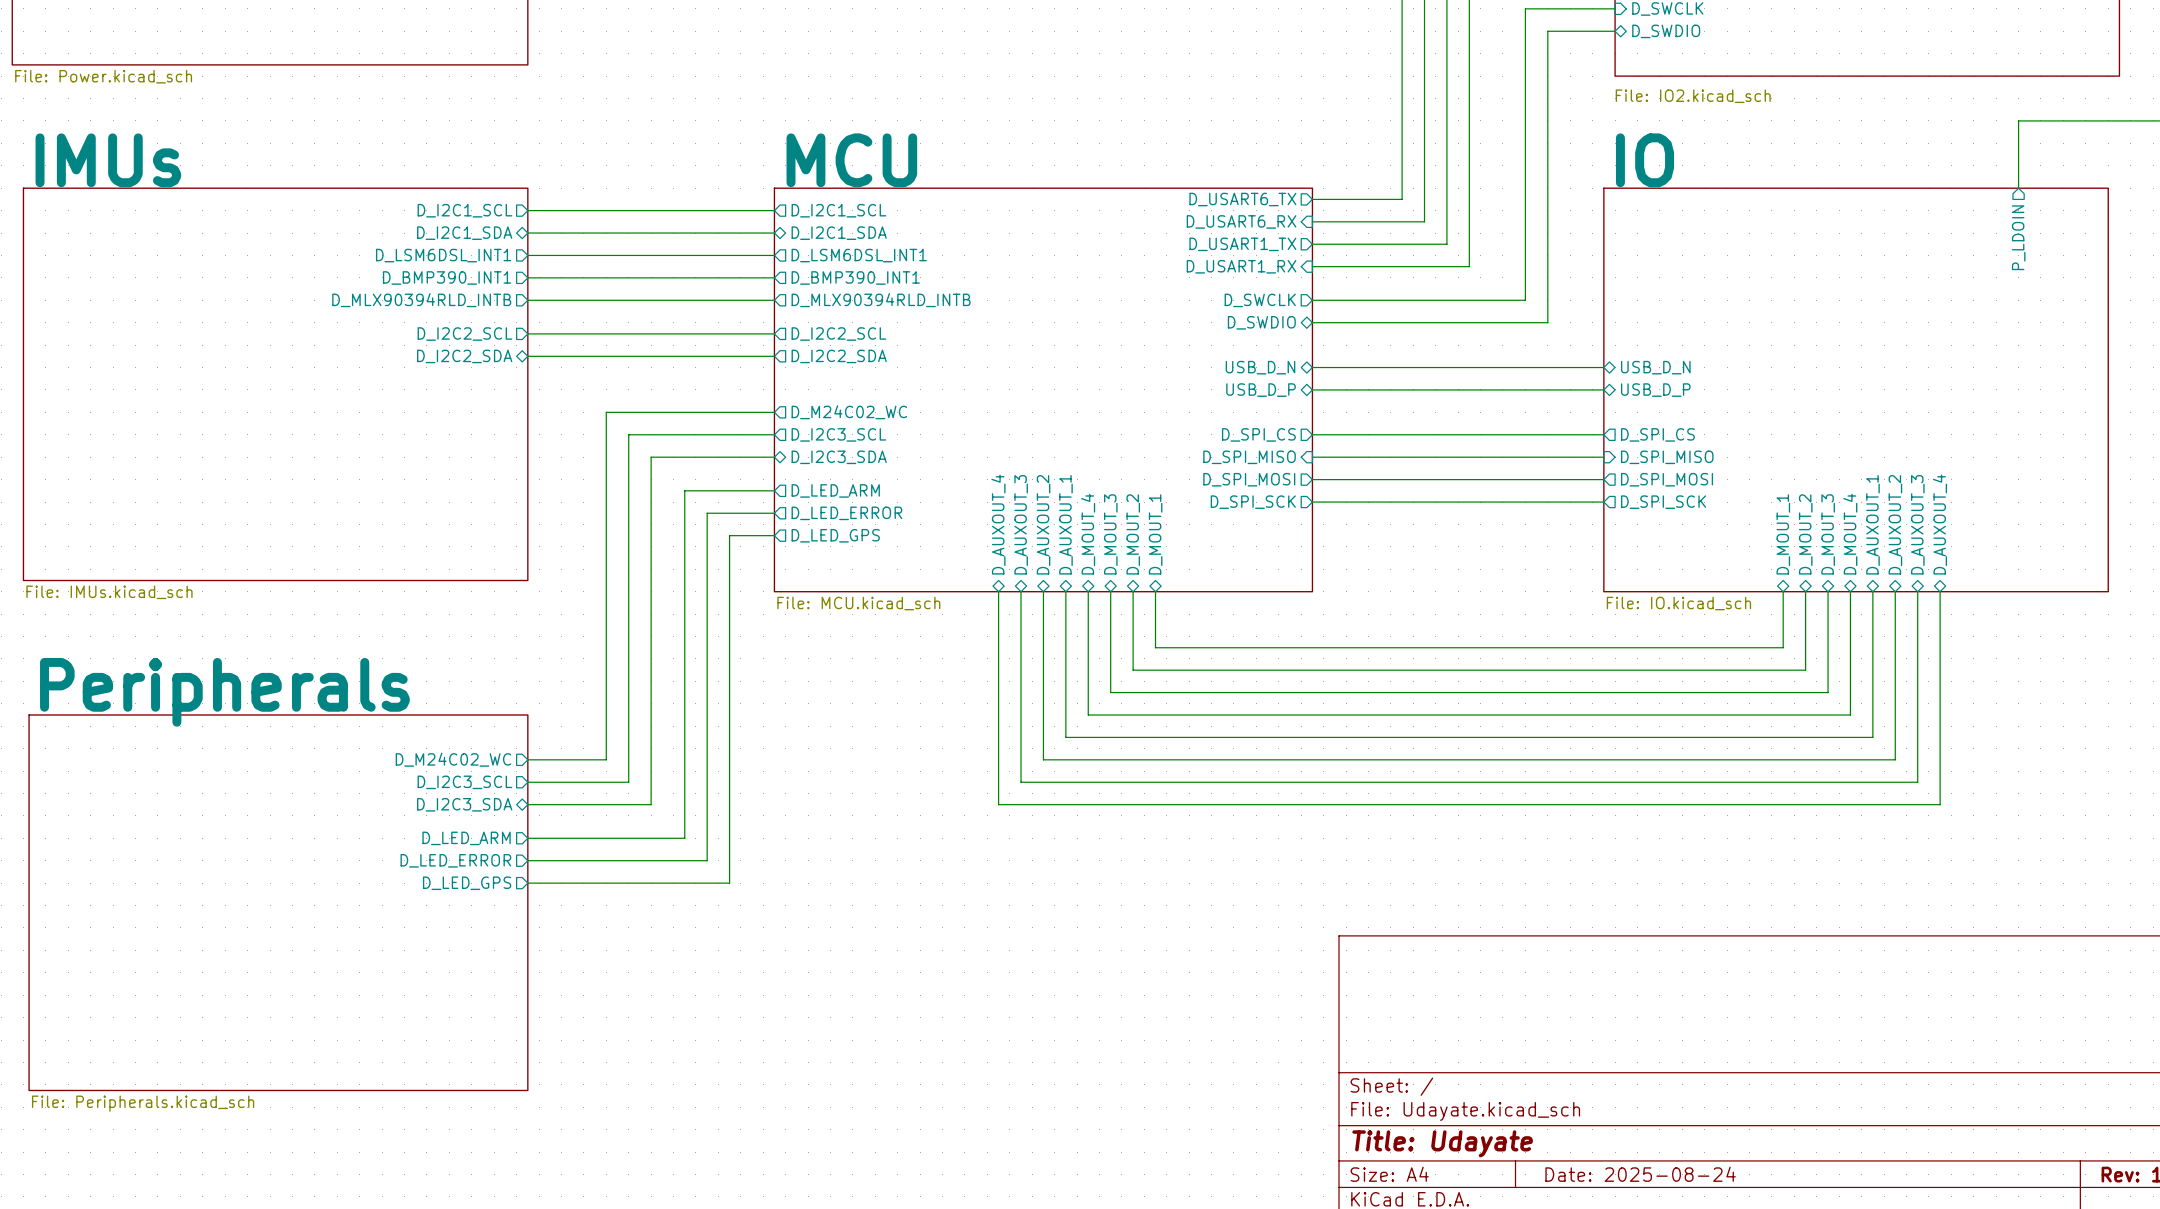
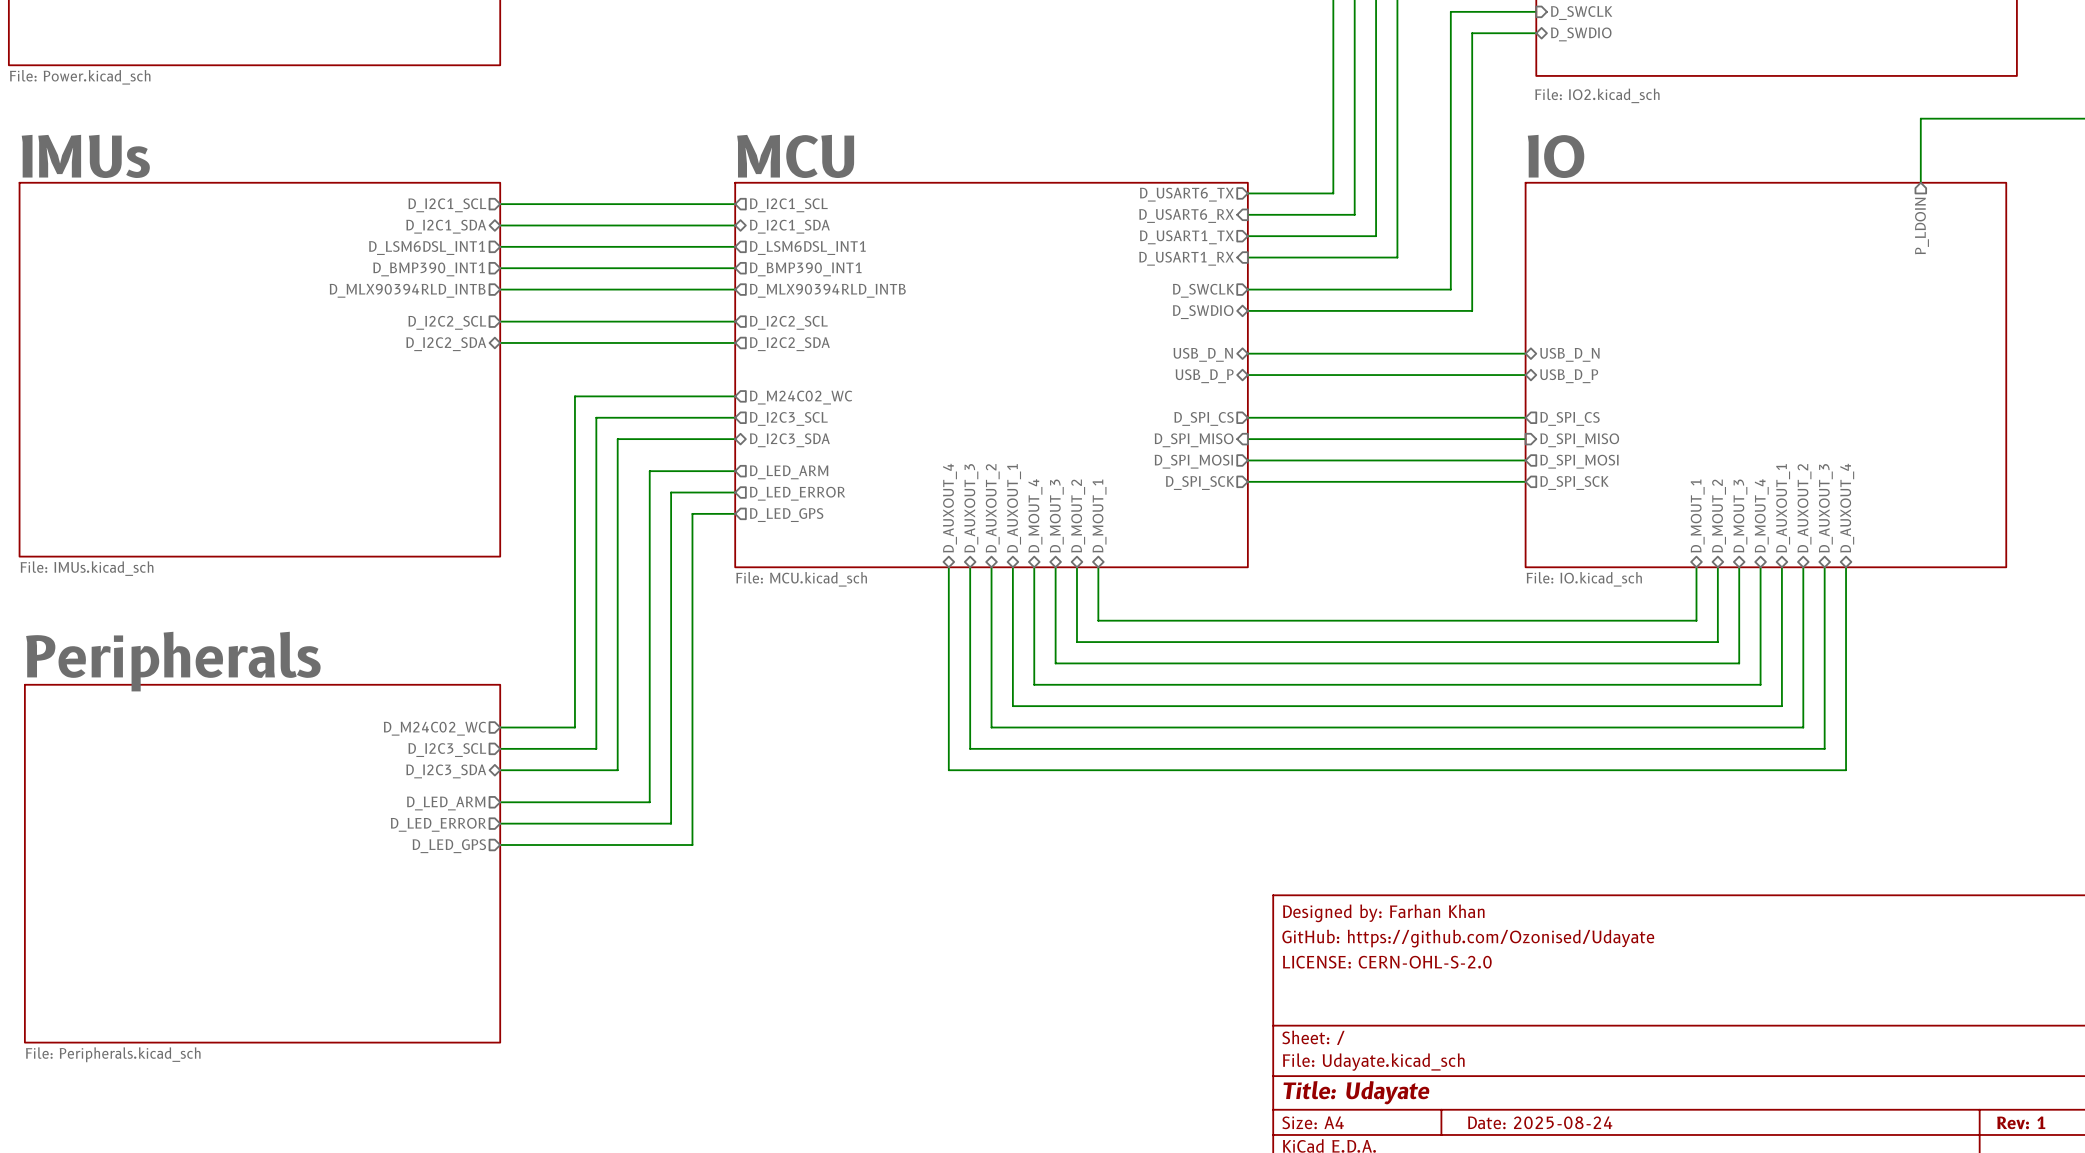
title block: none -> Designed by: Farhan Khan (1383, 913)
title block: none -> GitHub: https://github.com/Ozonised/Udayate (1468, 938)
title block: none -> LICENSE: CERN-OHL-S-2.0 (1387, 962)

